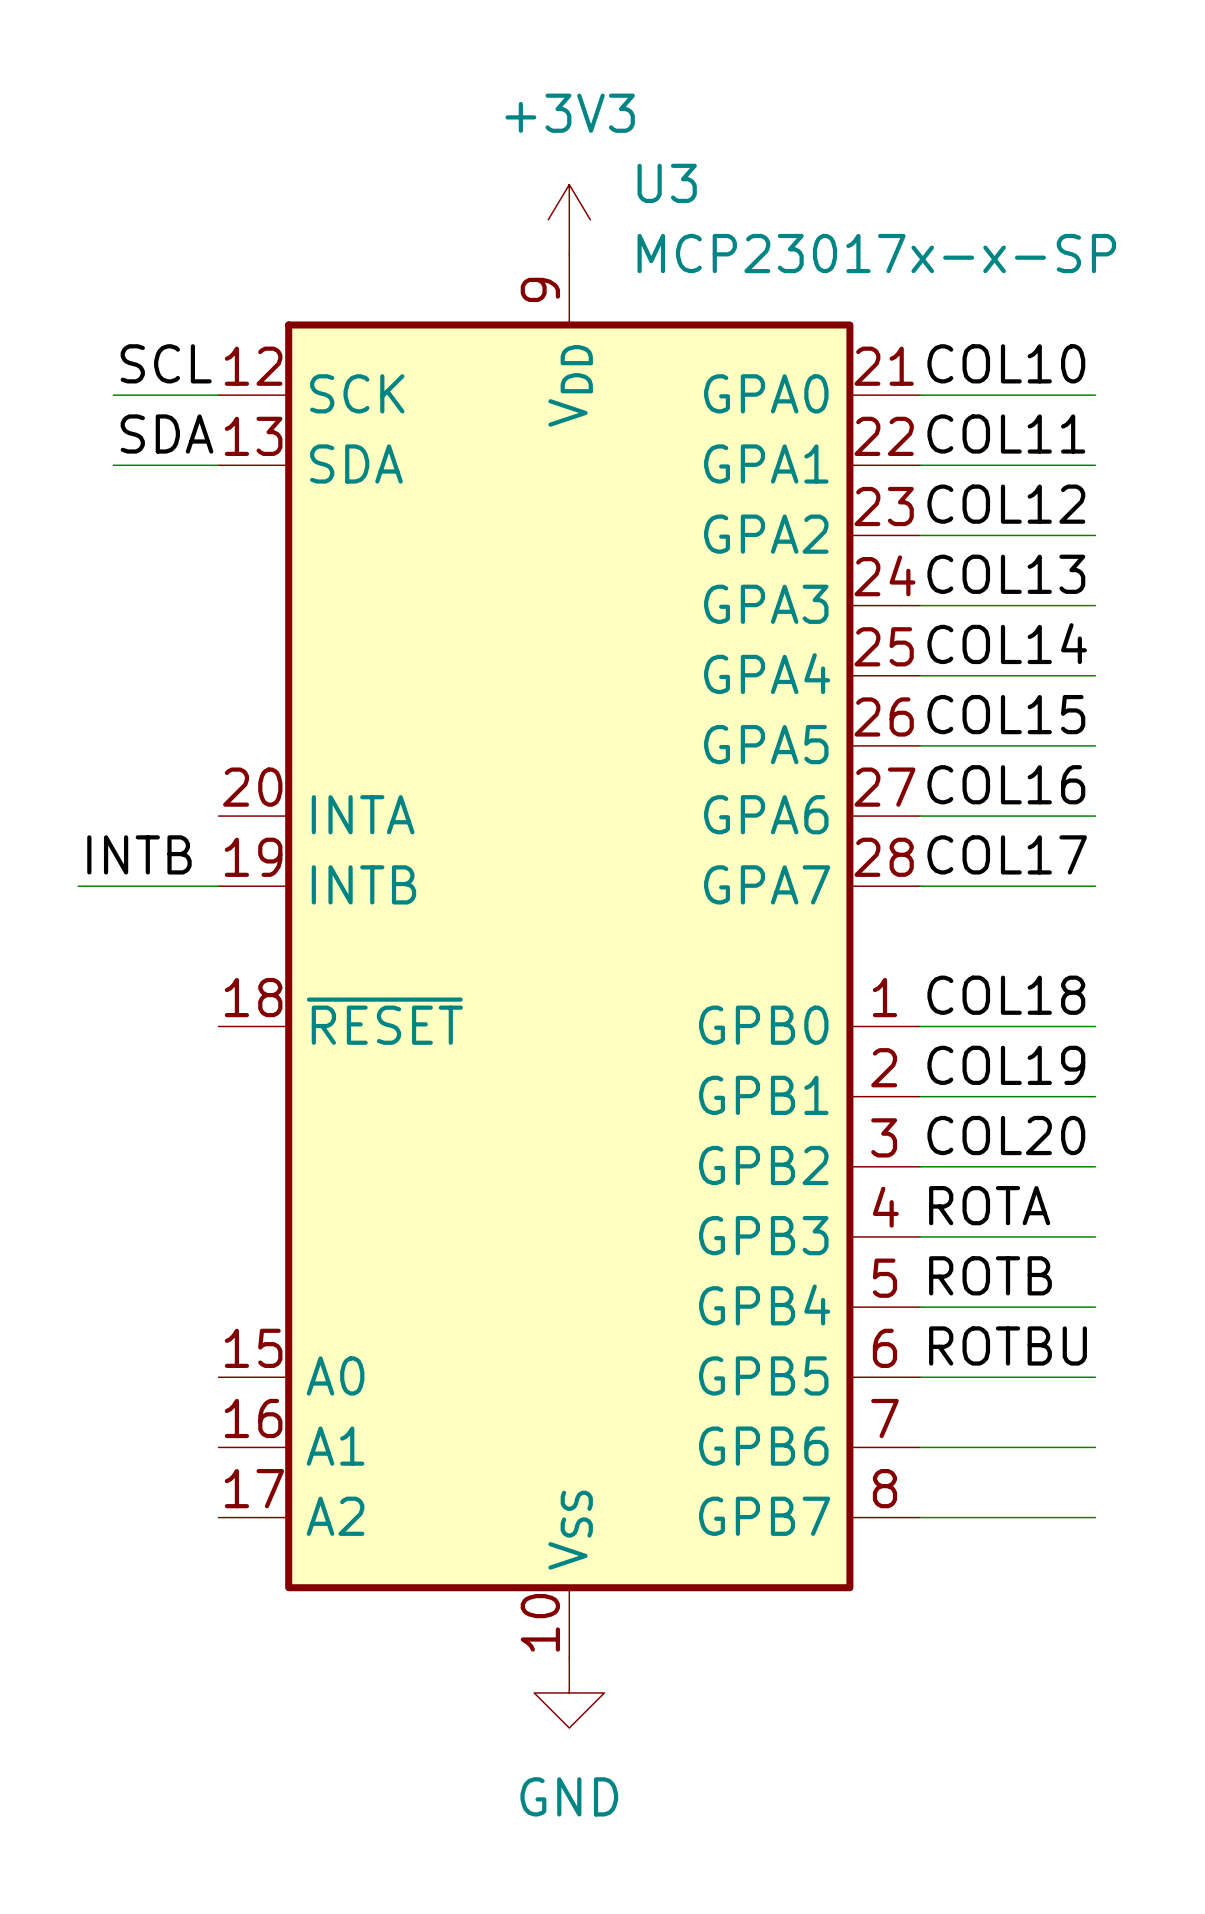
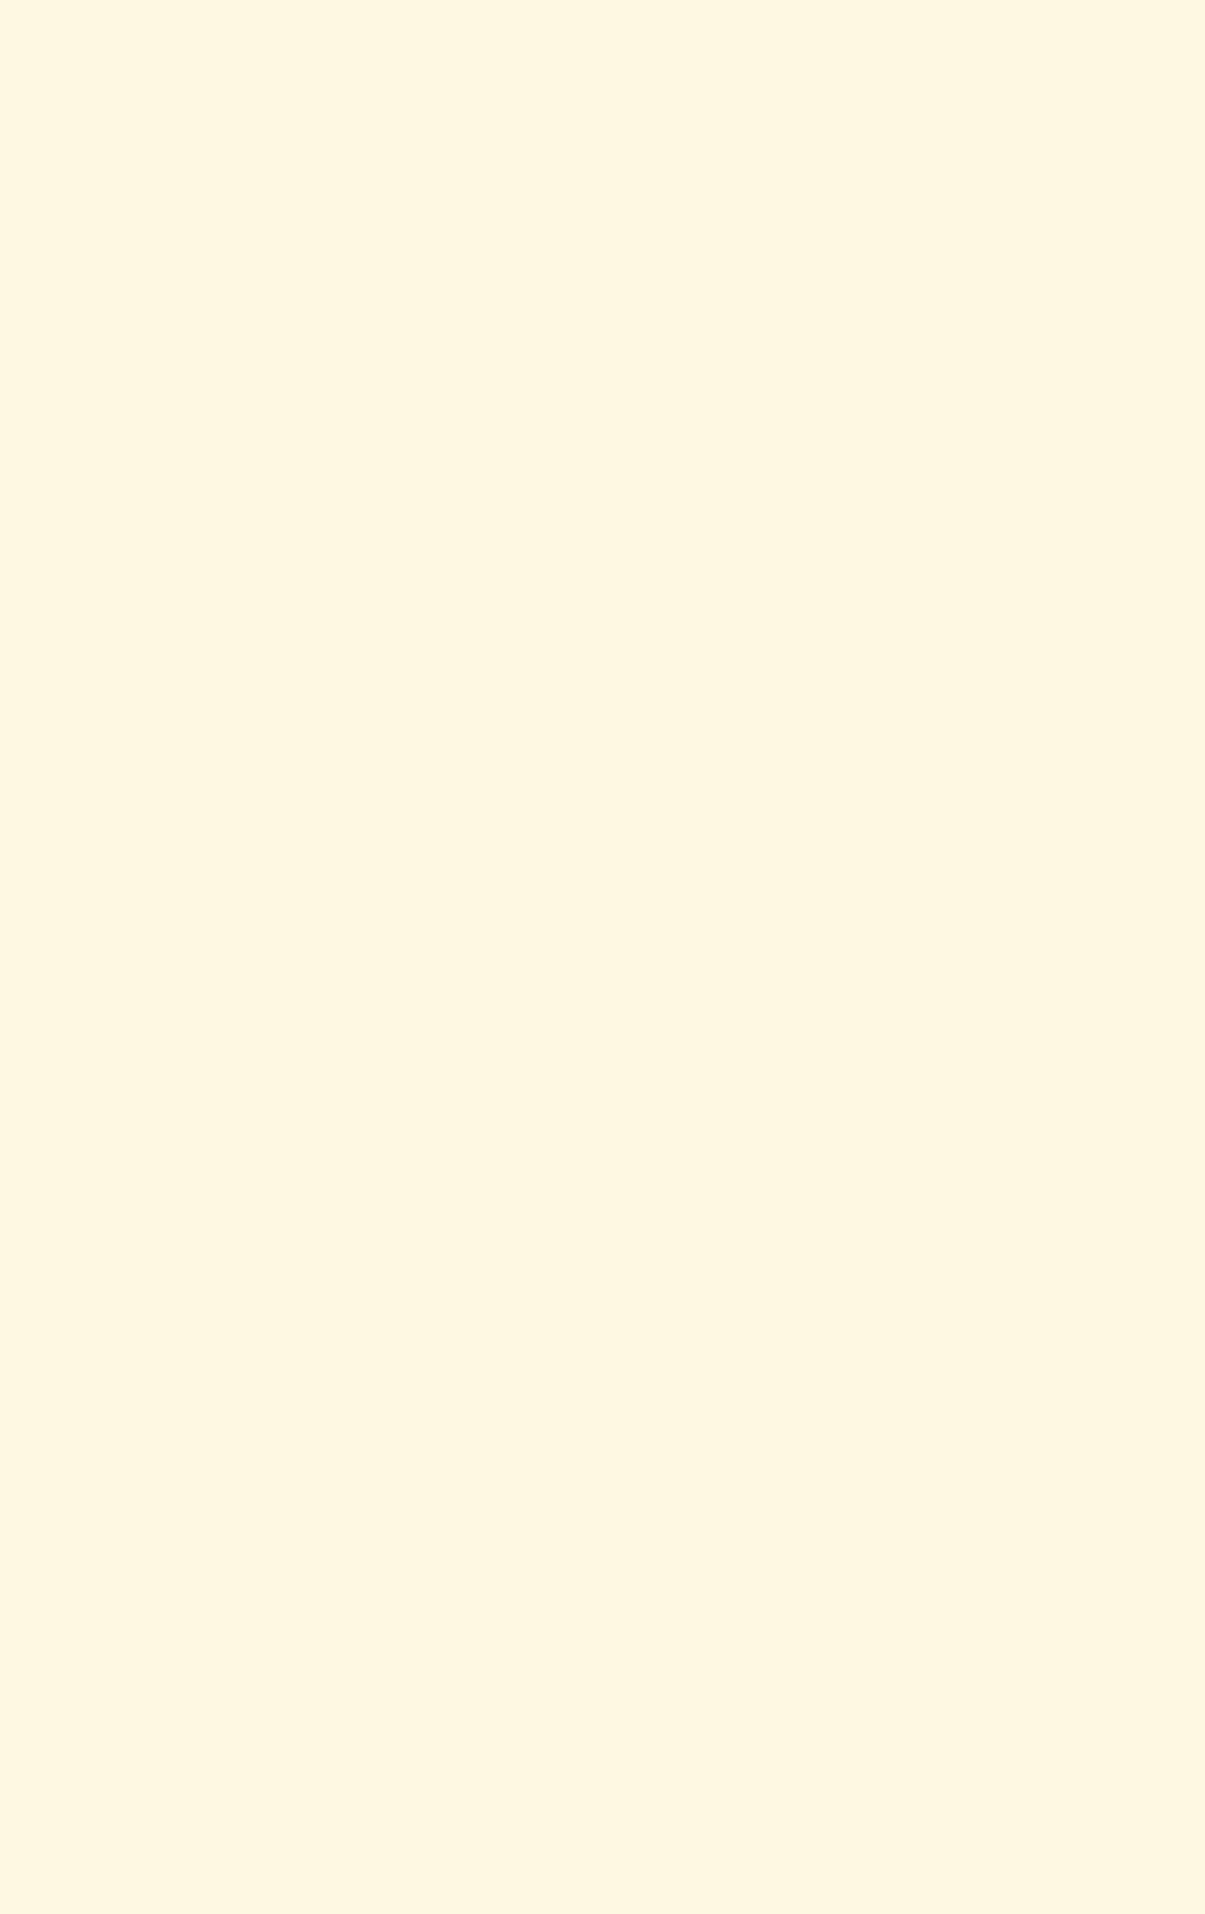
power symbol: +3V3 (569, 219) -> none
label: SCL (166, 363) -> none
label: COL10 (1006, 363) -> none
wire: (113, 395) (218, 395) -> none
wire: (920, 395) (1095, 395) -> none
label: SDA (167, 433) -> none
label: COL11 (1006, 433) -> none
wire: (113, 465) (218, 465) -> none
wire: (920, 465) (1095, 465) -> none
label: COL12 (1006, 504) -> none
wire: (920, 535) (1095, 535) -> none
label: COL13 (1006, 574) -> none
wire: (920, 605) (1095, 605) -> none
label: COL14 (1007, 643) -> none
wire: (920, 675) (1095, 675) -> none
label: COL15 (1006, 714) -> none
wire: (920, 745) (1095, 745) -> none
label: COL16 (1006, 784) -> none
wire: (920, 816) (1095, 816) -> none
label: INTB (139, 854) -> none
label: COL17 (1007, 854) -> none
wire: (78, 886) (218, 886) -> none
wire: (920, 886) (1095, 886) -> none
U3: MCP23017x-x-SP (569, 956) -> none
label: COL18 (1006, 995) -> none
wire: (920, 1026) (1095, 1026) -> none
label: COL19 (1006, 1065) -> none
wire: (920, 1096) (1095, 1096) -> none
label: COL20 (1006, 1135) -> none
wire: (920, 1166) (1095, 1166) -> none
label: ROTA (989, 1205) -> none
wire: (920, 1236) (1095, 1236) -> none
label: ROTB (990, 1275) -> none
wire: (920, 1307) (1095, 1307) -> none
label: ROTBU (1008, 1345) -> none
wire: (920, 1377) (1095, 1377) -> none
wire: (920, 1447) (1095, 1447) -> none
wire: (920, 1517) (1095, 1517) -> none
power symbol: GND (569, 1692) -> none

